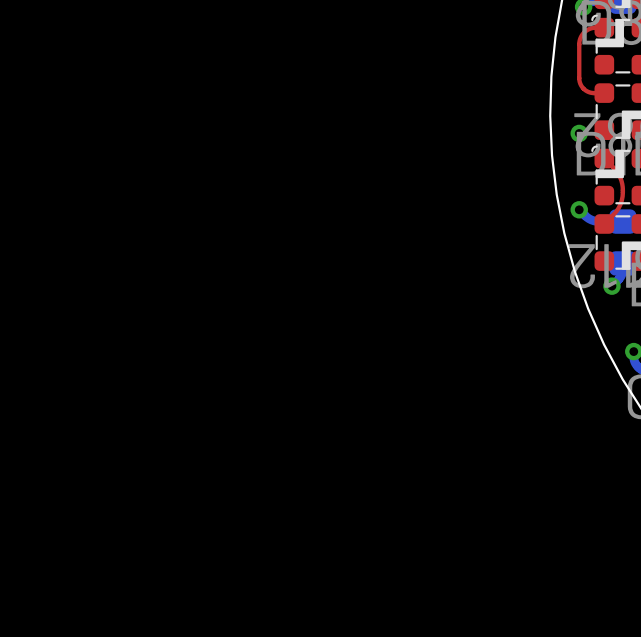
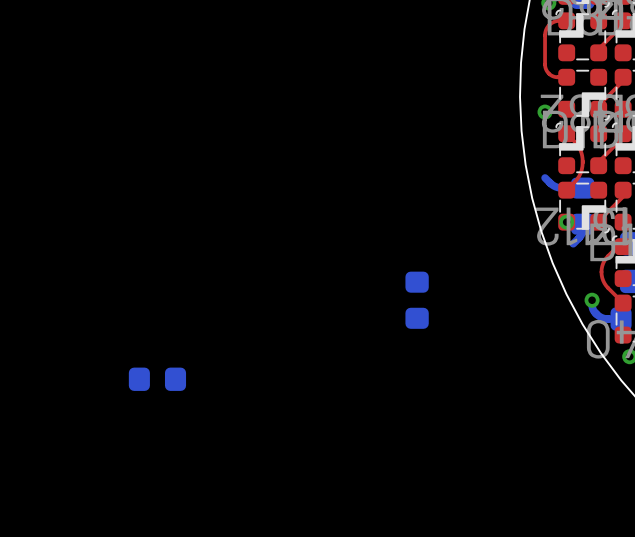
via: (579, 209) -> none
via: none -> (566, 222)
via: (611, 286) -> none
part: none -> (417, 300)
part: none -> (157, 379)

